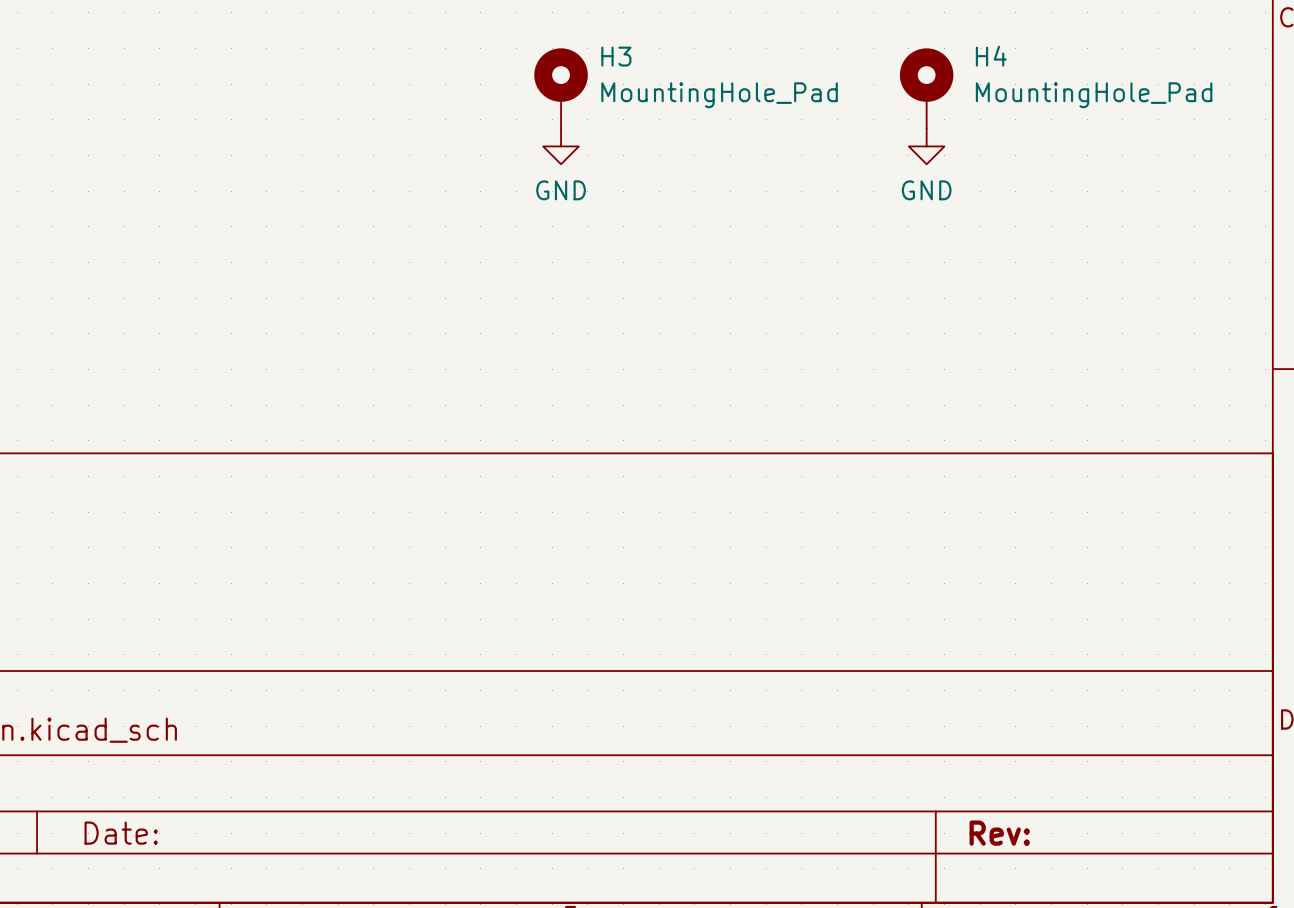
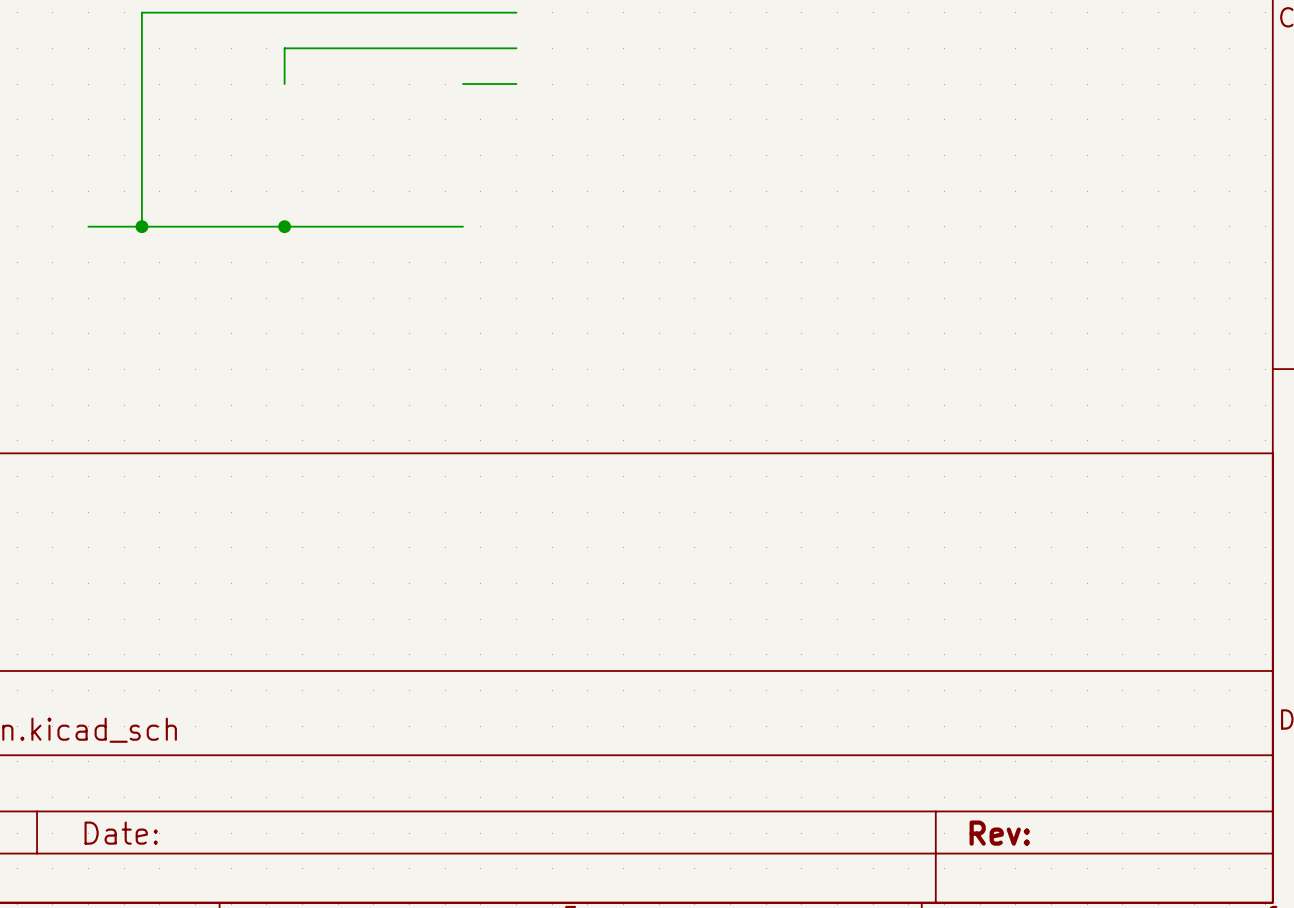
wire: none -> (516, 12) (141, 12) (141, 226)
wire: none -> (516, 48) (284, 48) (284, 84)
wire: none -> (462, 84) (516, 84)
H3: MountingHole_Pad (561, 88) -> none
H4: MountingHole_Pad (926, 88) -> none
power symbol: GND (561, 146) -> none
power symbol: GND (926, 146) -> none
wire: none -> (88, 226) (462, 226)
junction: none -> (141, 226)
junction: none -> (284, 226)

